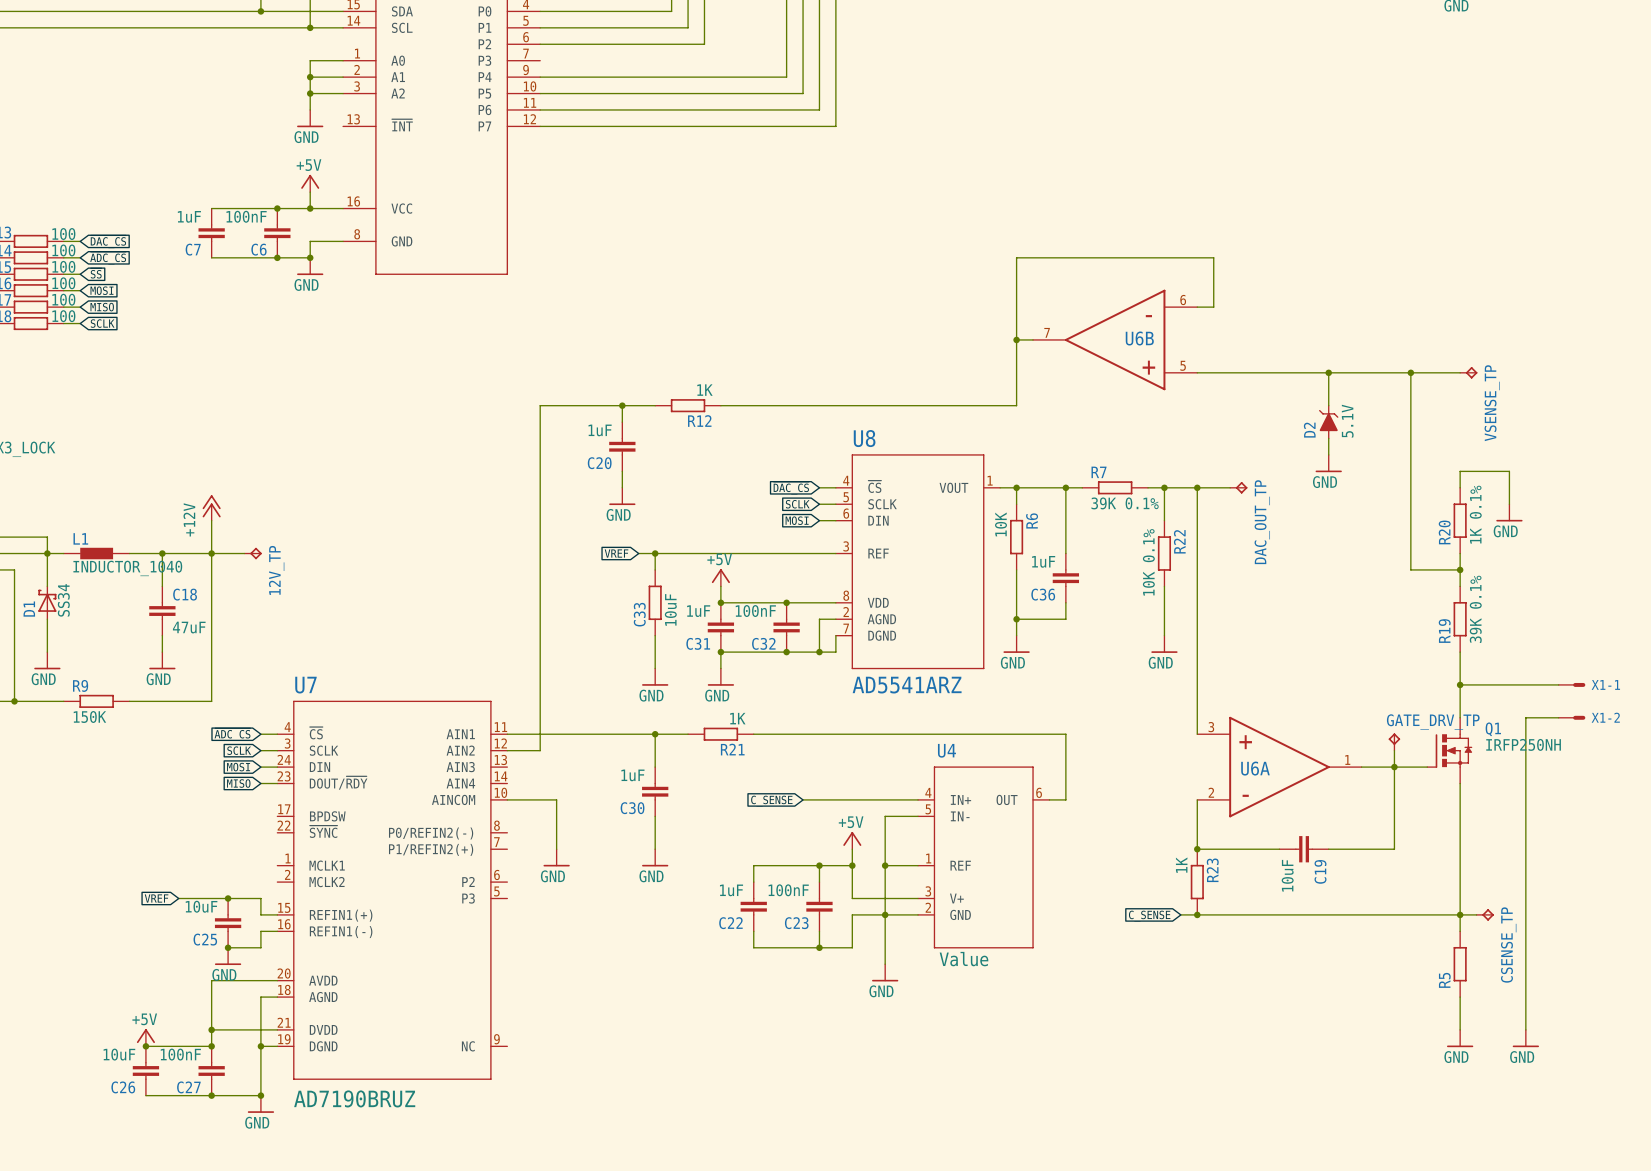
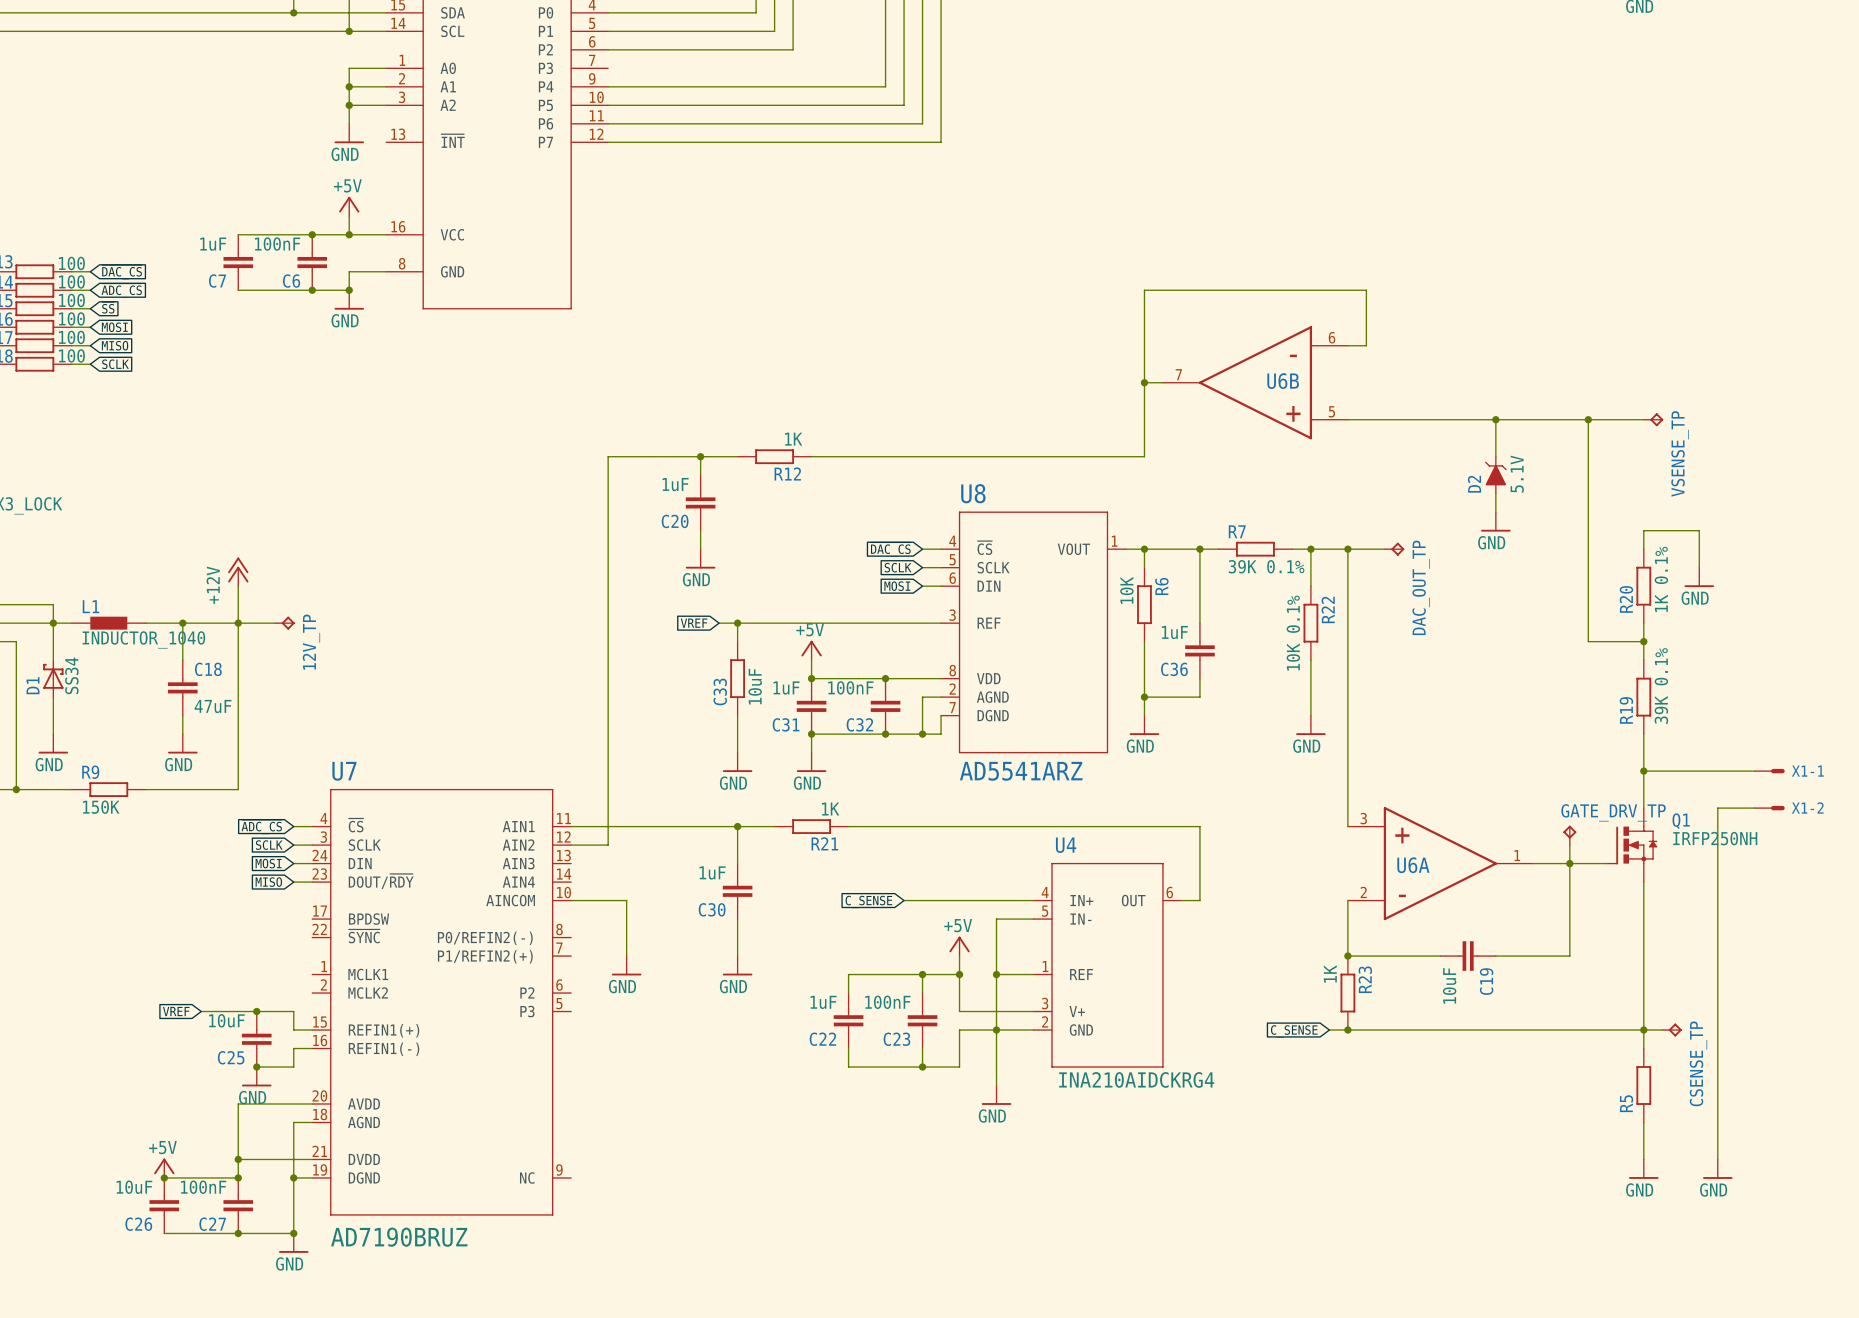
U4 value: Value (963, 959) -> INA210AIDCKRG4 (1136, 1079)

